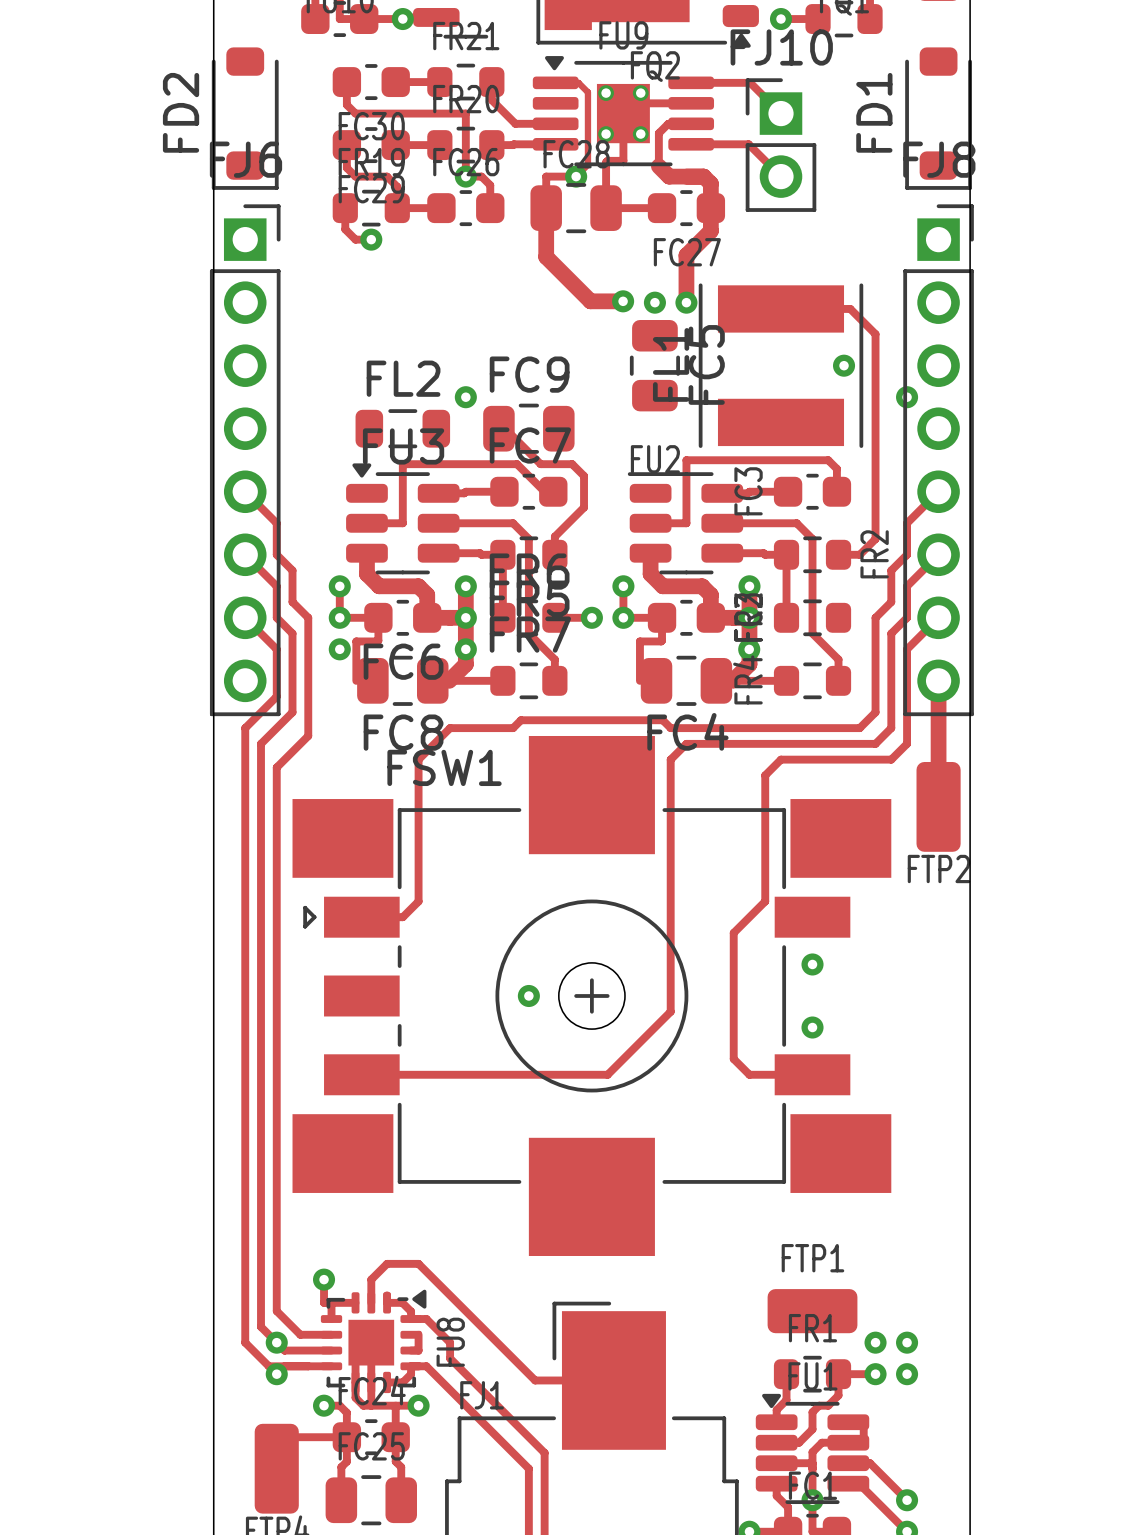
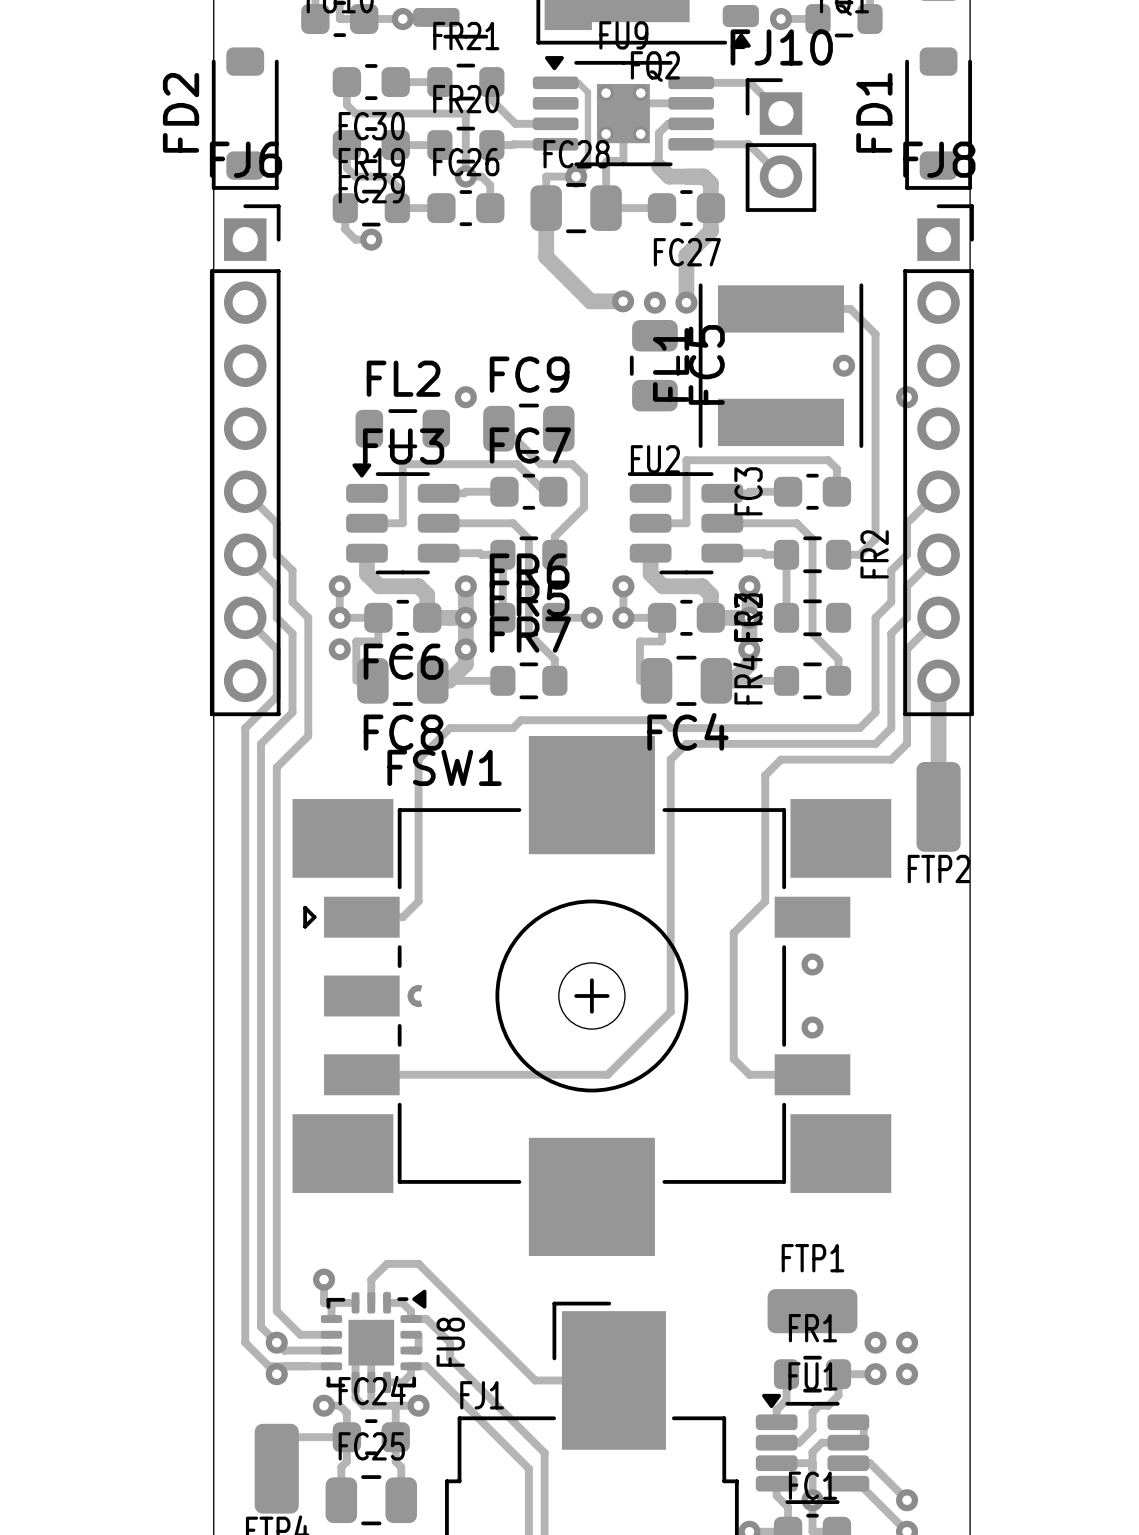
via position: (528, 995) -> (418, 995)

